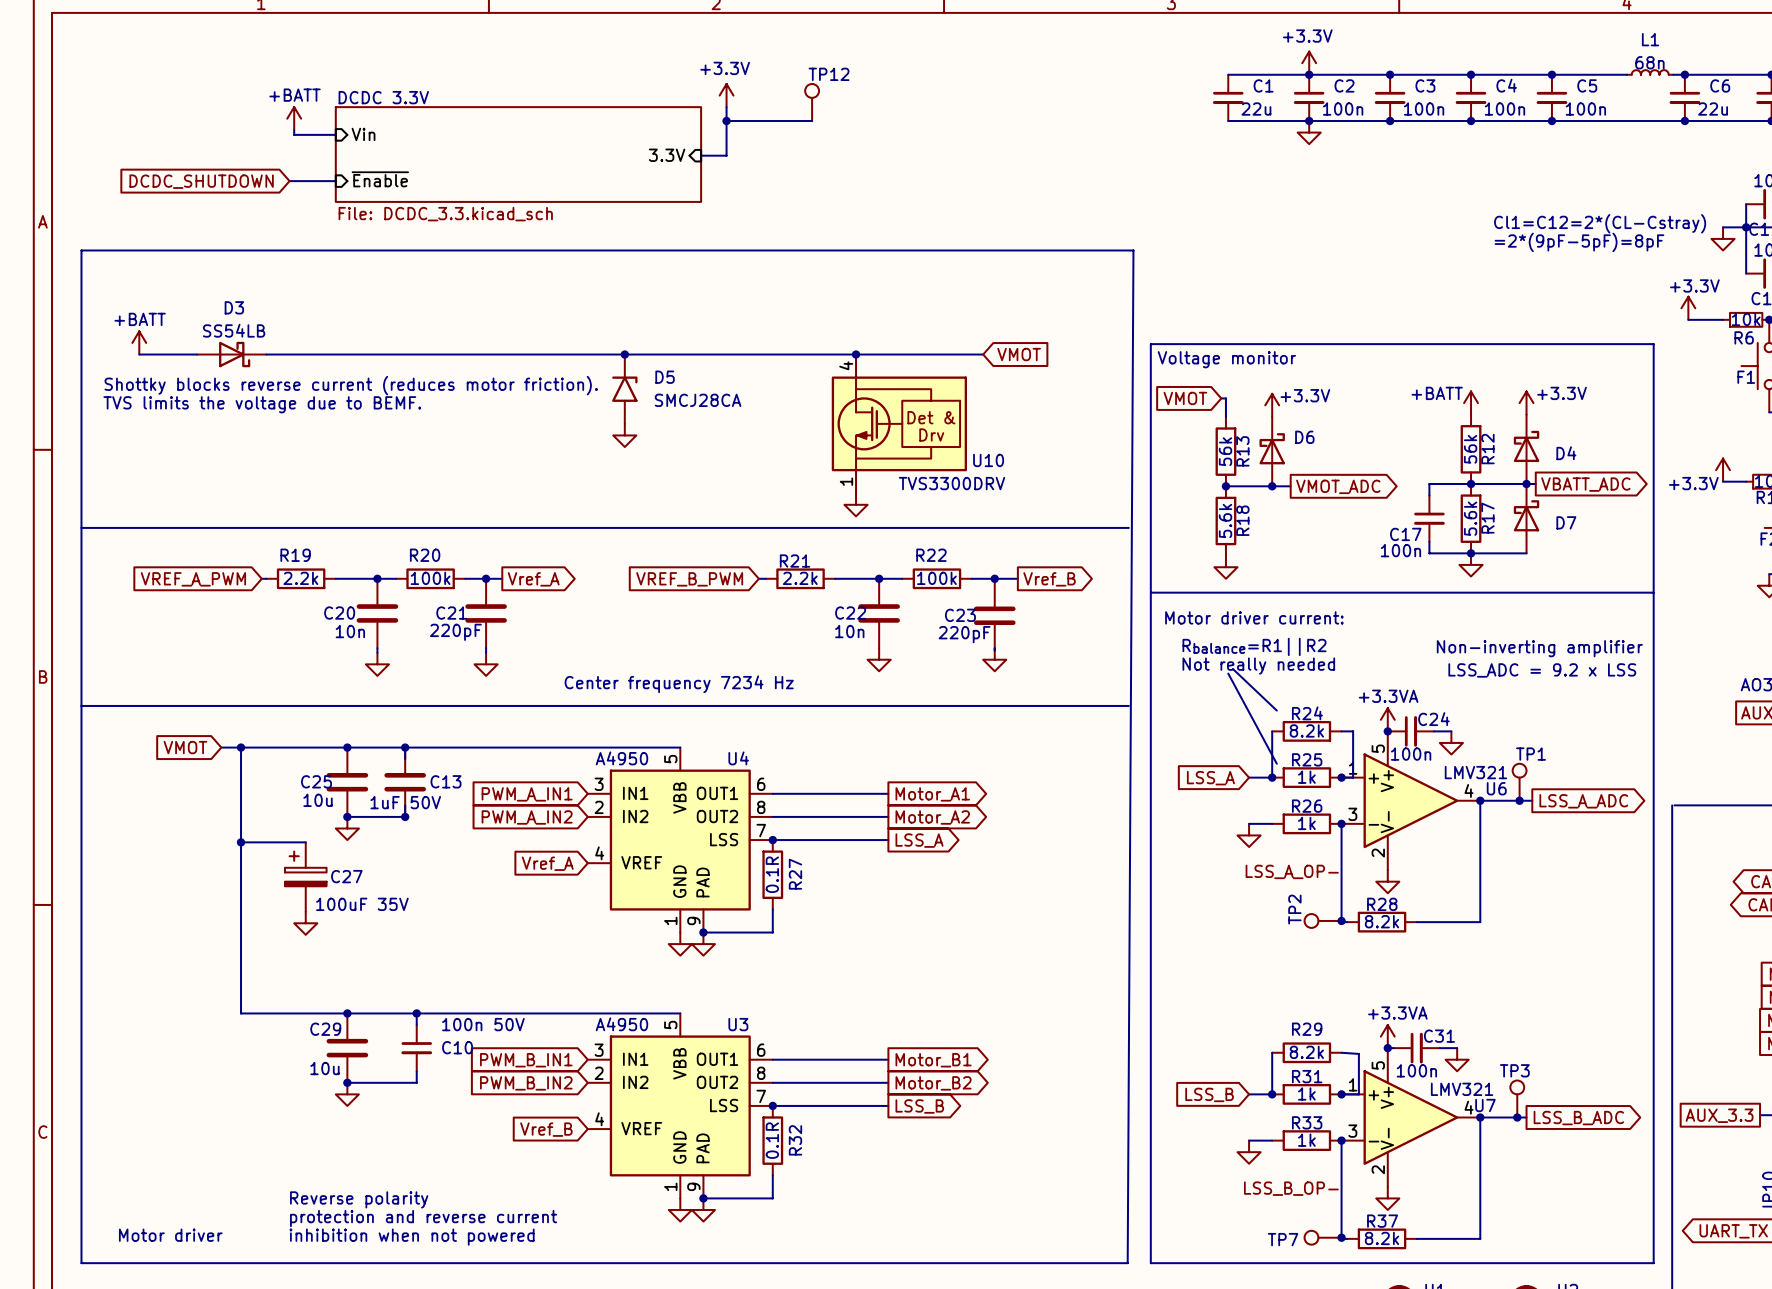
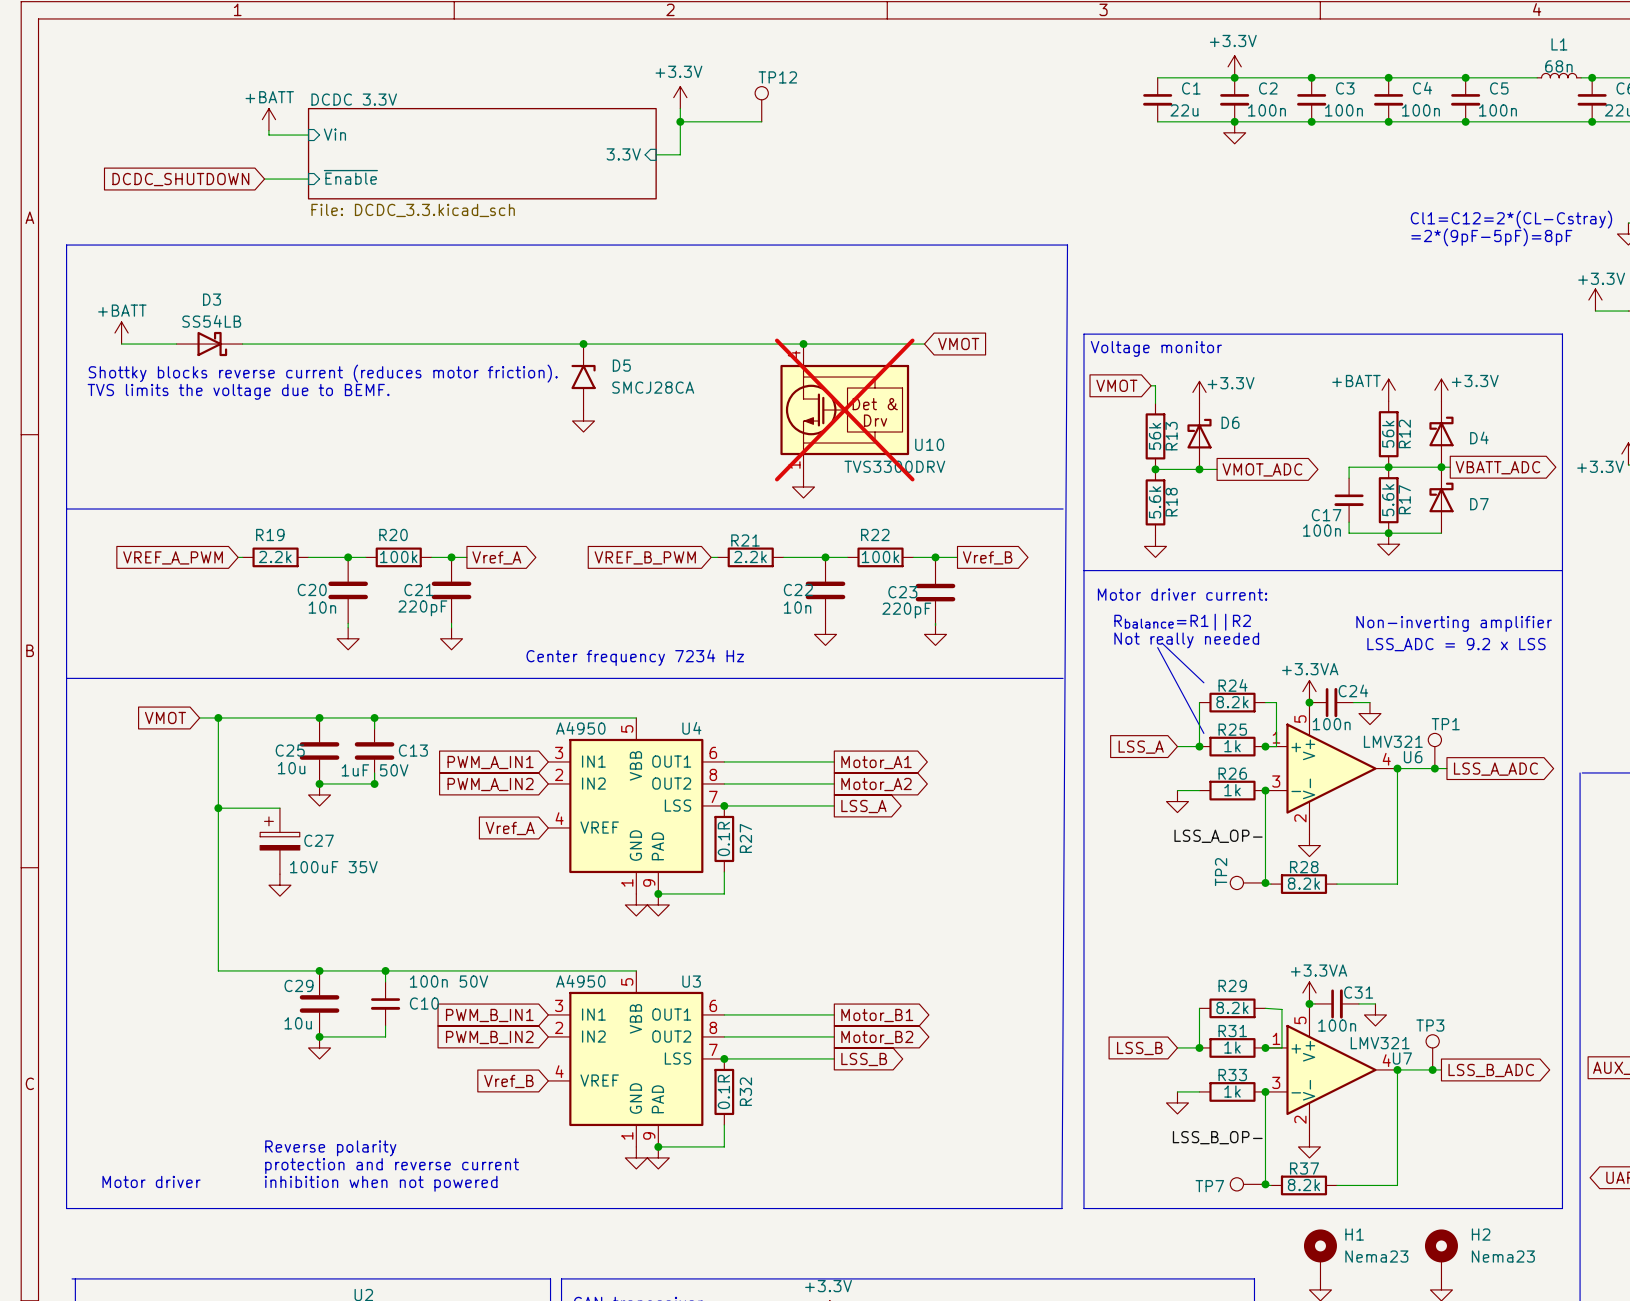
U10 do-not-place cross: none -> (844, 410)

